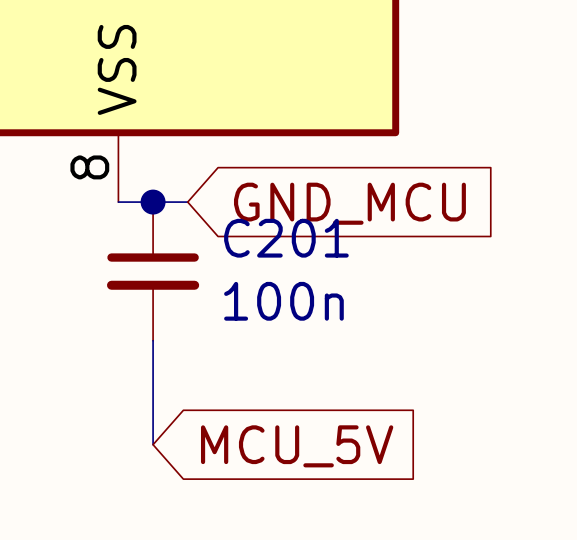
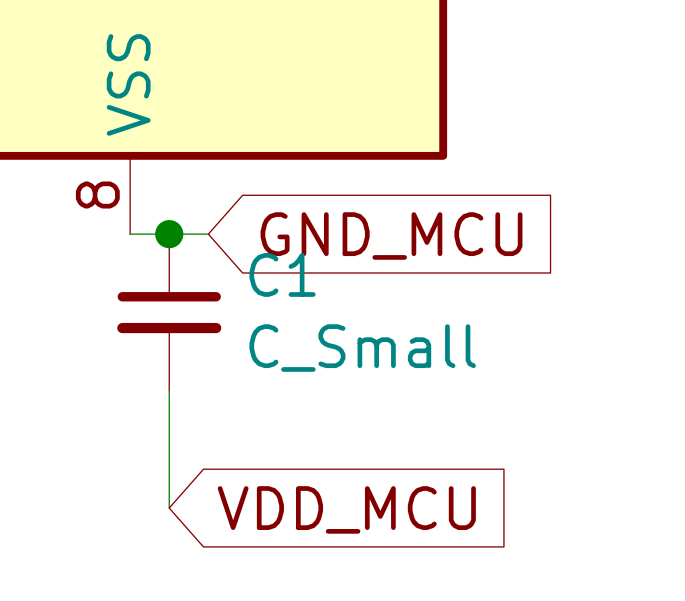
C201 name: C201 (286, 238) -> C1 (282, 274)
C201 value: 100n (283, 301) -> C_Small (362, 348)
global label: MCU_5V (297, 446) -> VDD_MCU (346, 509)

